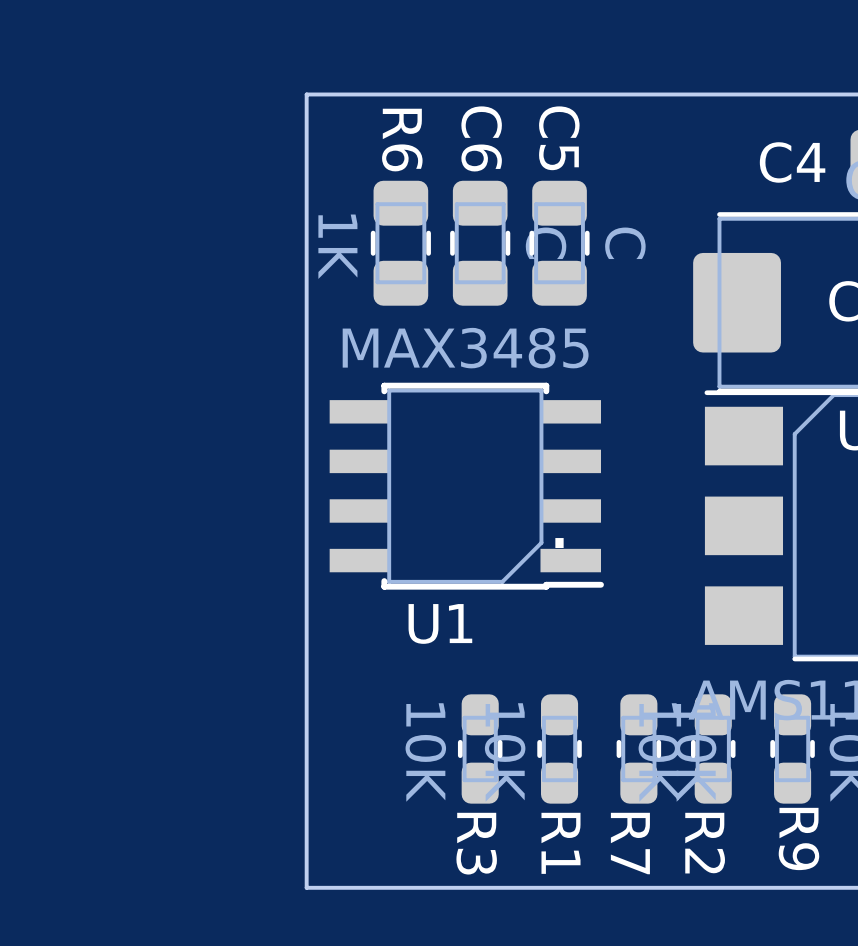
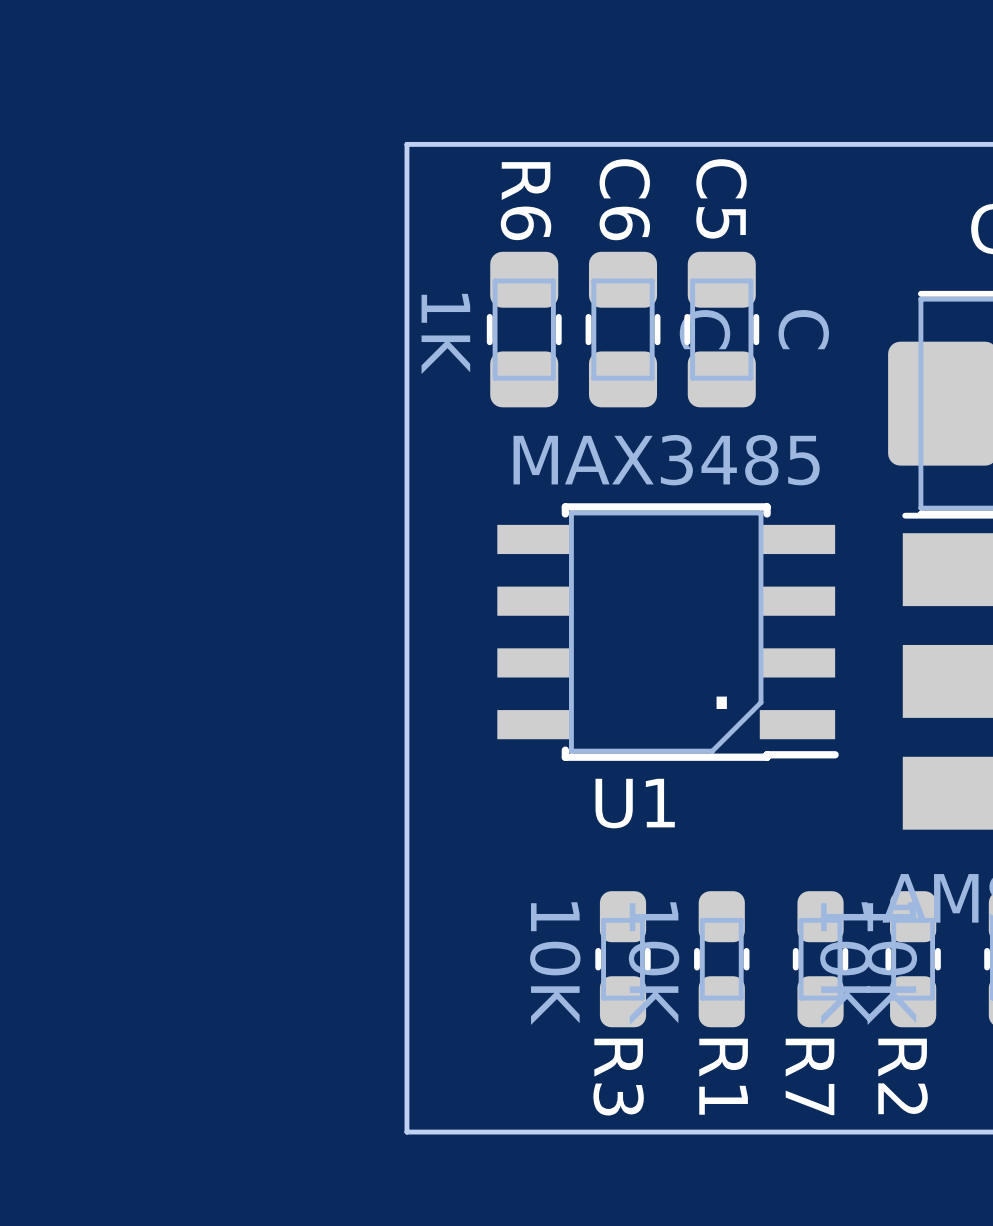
U1 position: (466, 486) -> (668, 632)

